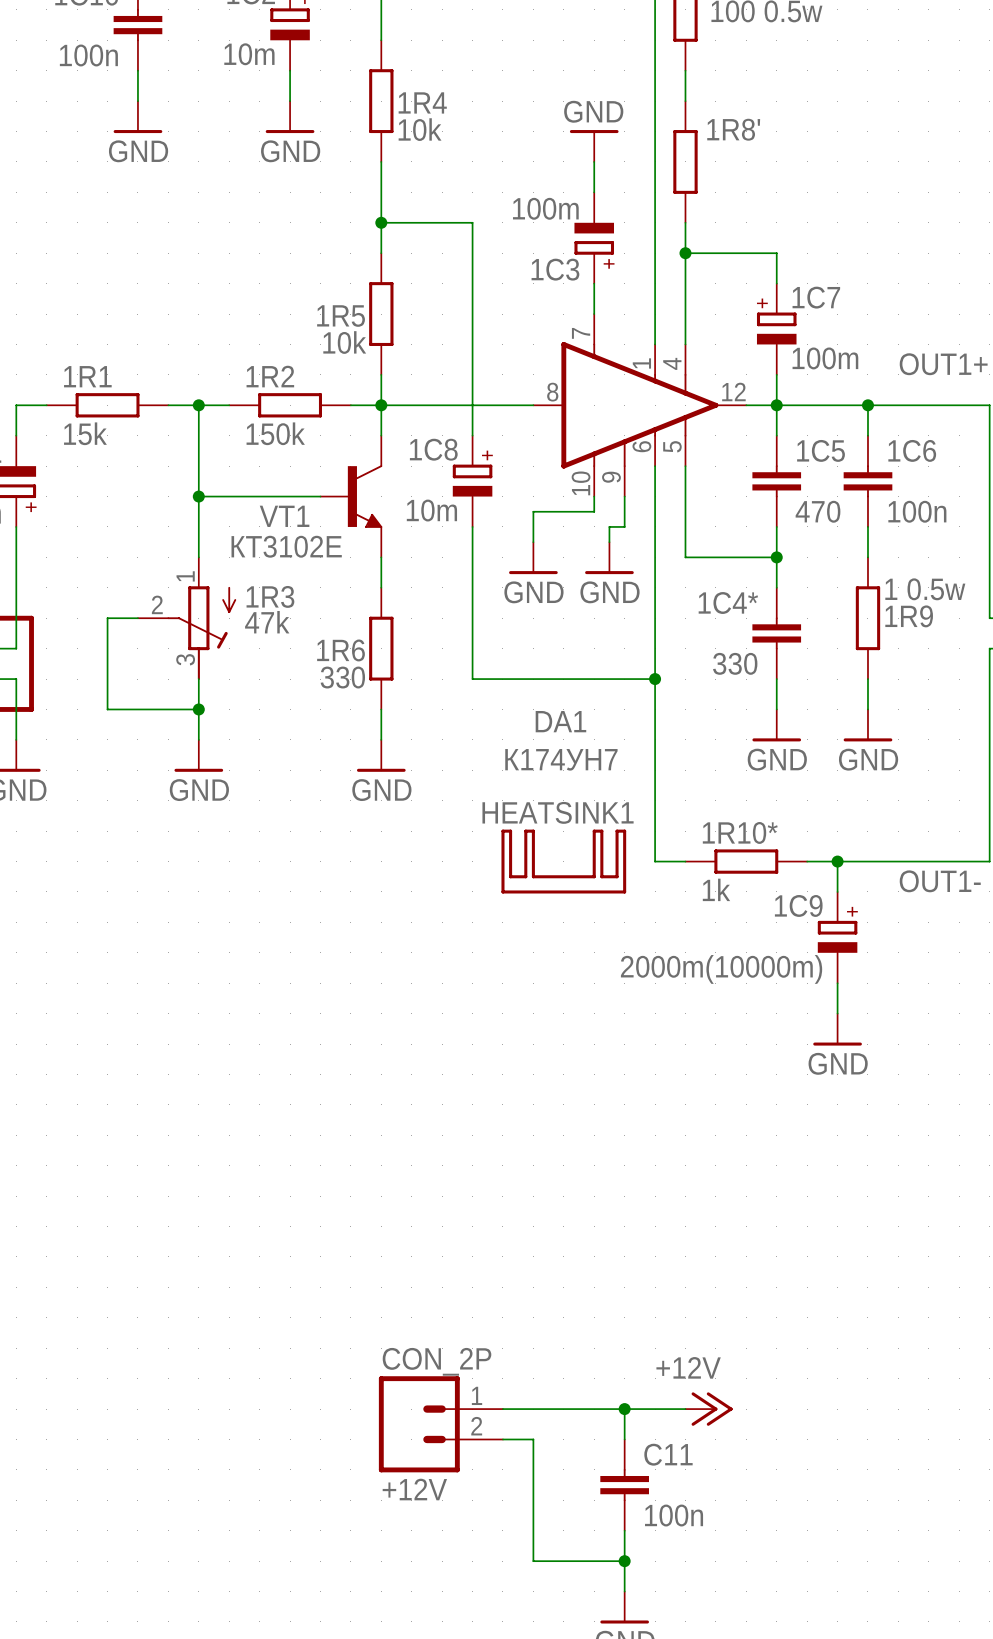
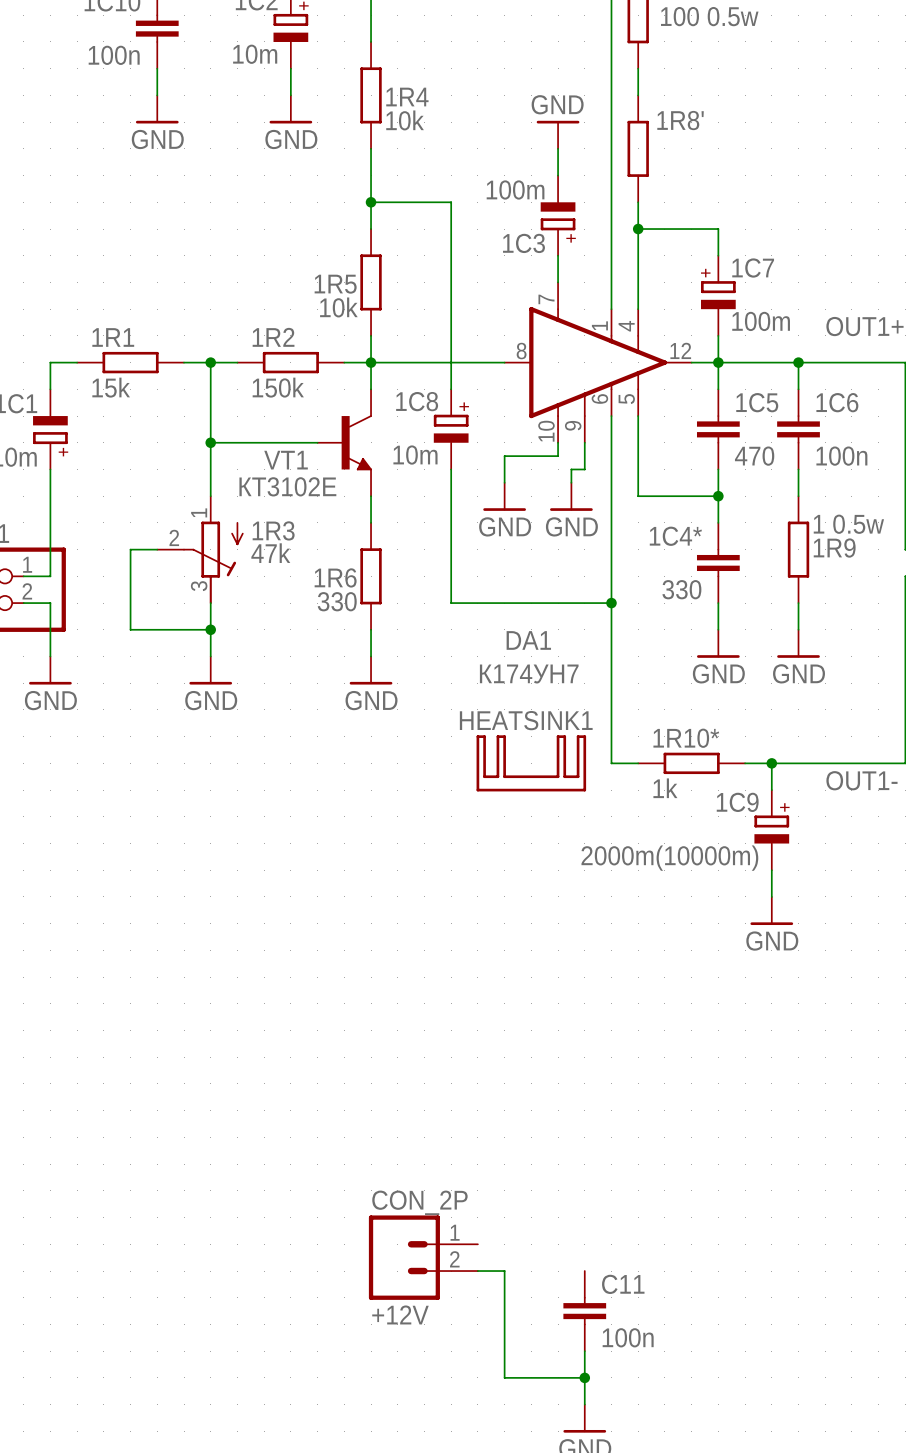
wire: (502, 1409) (685, 1409) -> none
wire: (624, 1409) (624, 1439) -> none
junction: (624, 1409) -> none
power symbol: +12V (709, 1409) -> none

